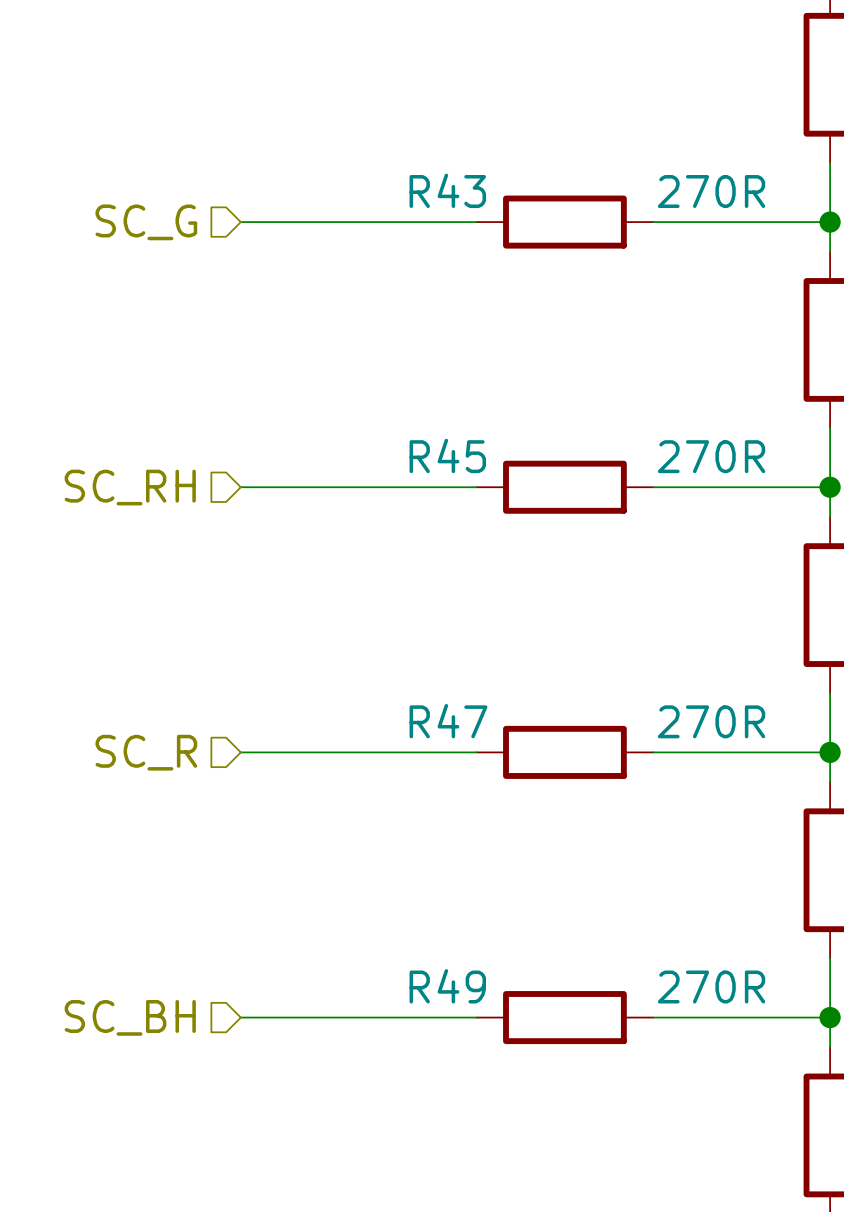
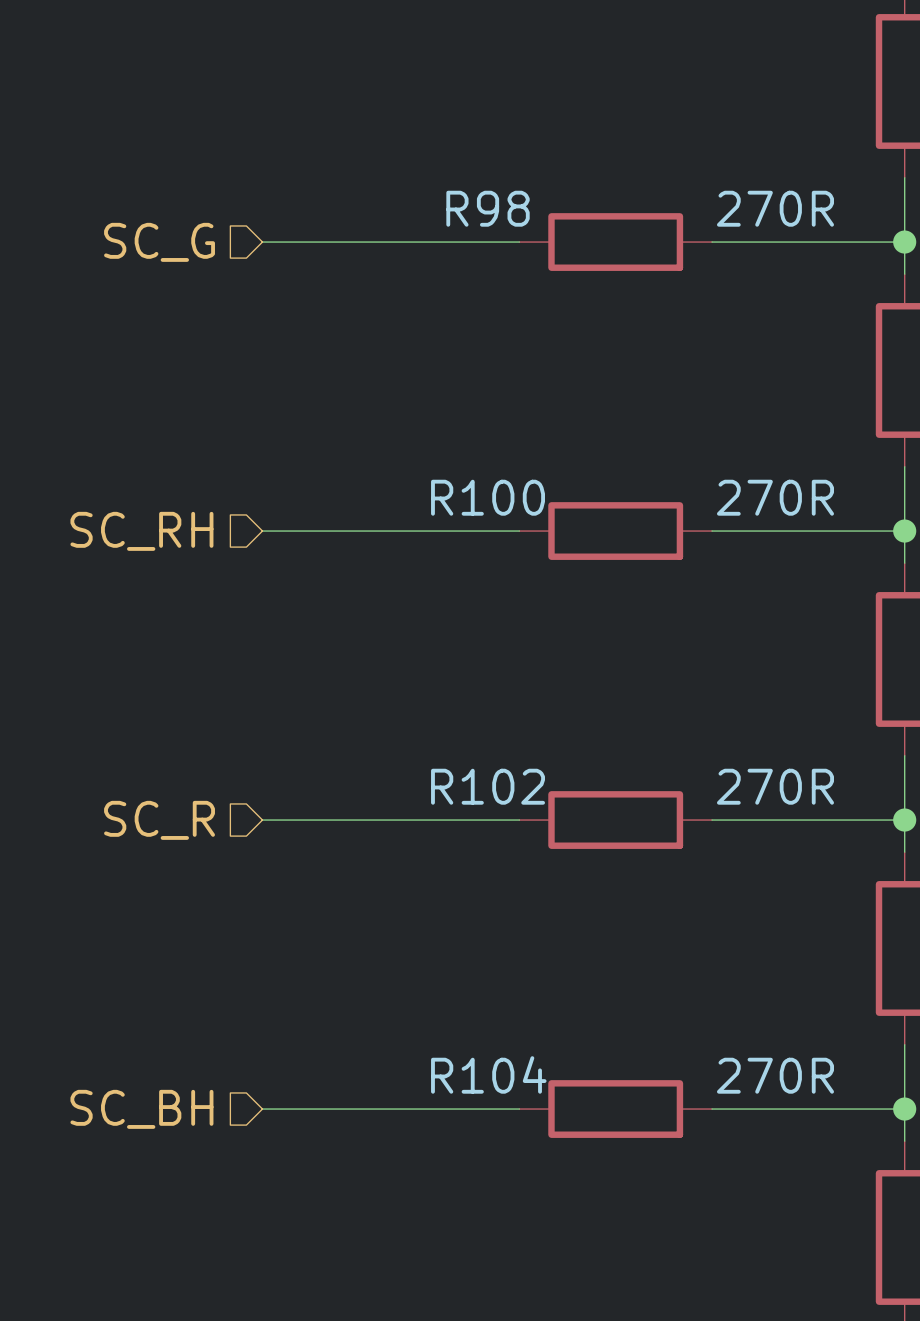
R43 name: R43 (447, 190) -> R98 (488, 208)
R45 name: R45 (447, 455) -> R100 (488, 497)
R47 name: R47 (448, 721) -> R102 (488, 786)
R49 name: R49 (447, 986) -> R104 (488, 1074)

